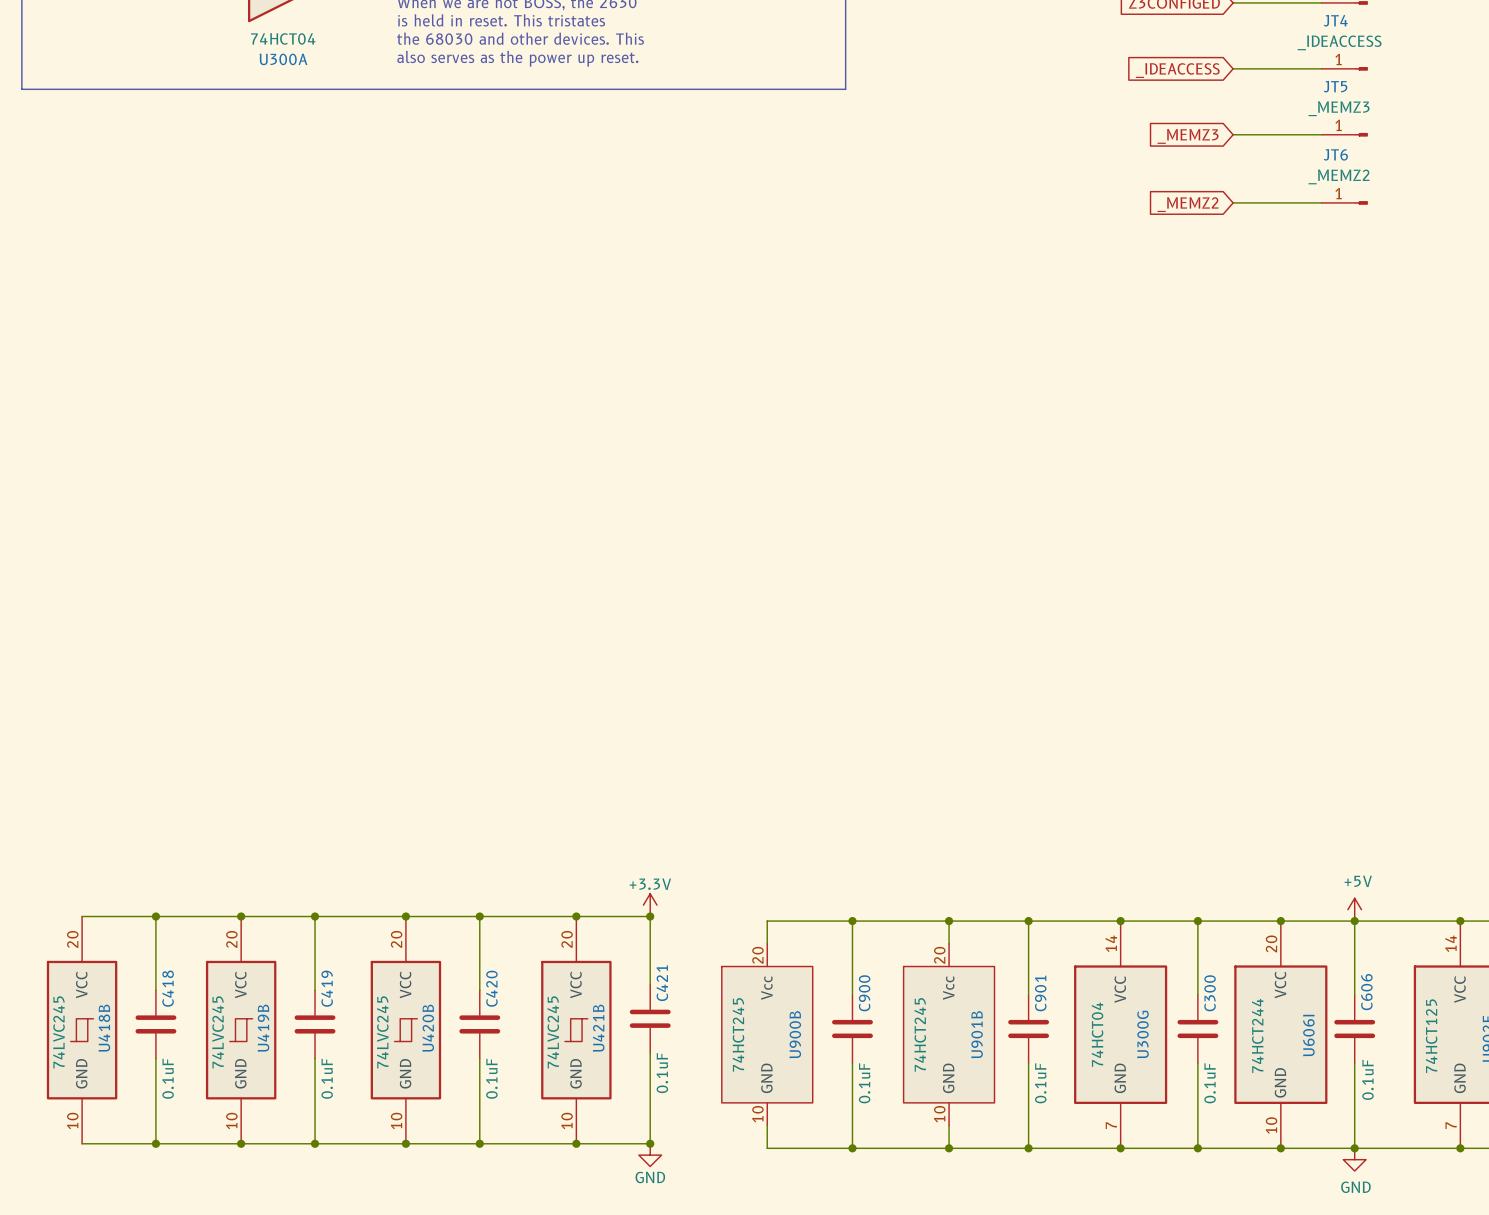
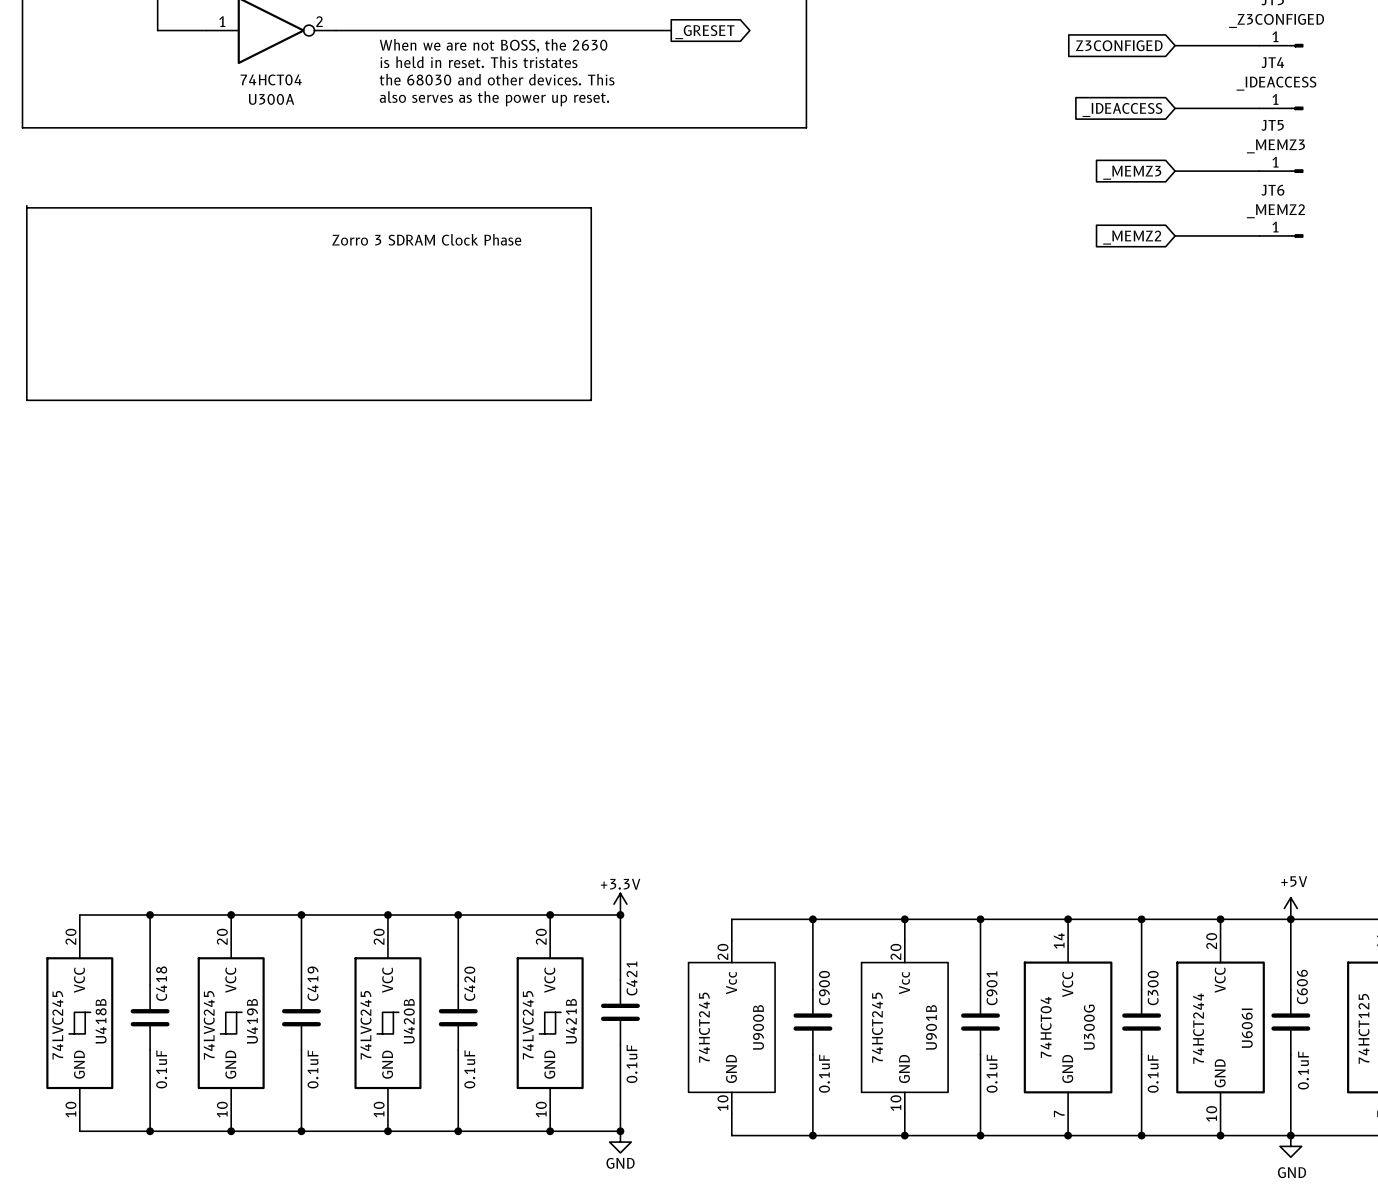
line: none -> (26, 205) (26, 400) (591, 400) (591, 207) (26, 207)
text: none -> Zorro 3 SDRAM Clock Phase (426, 239)

